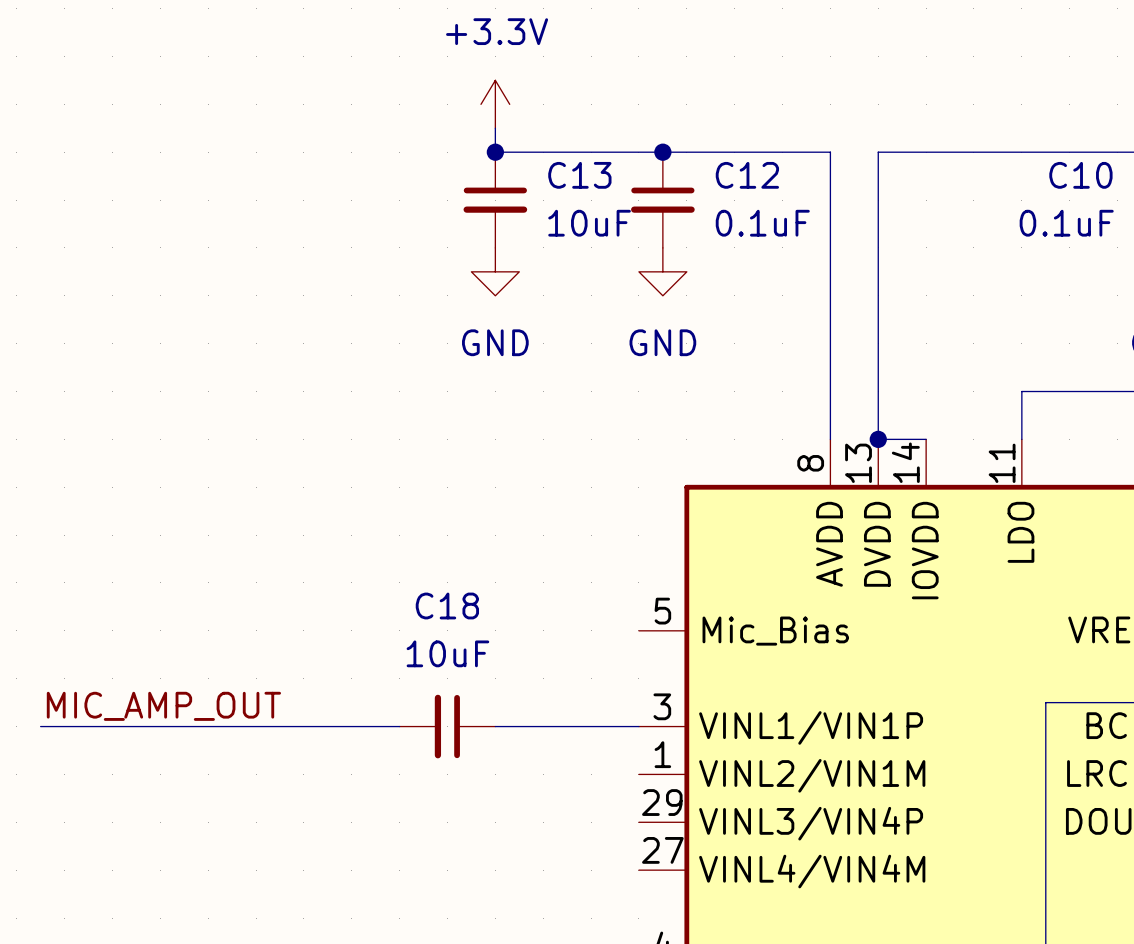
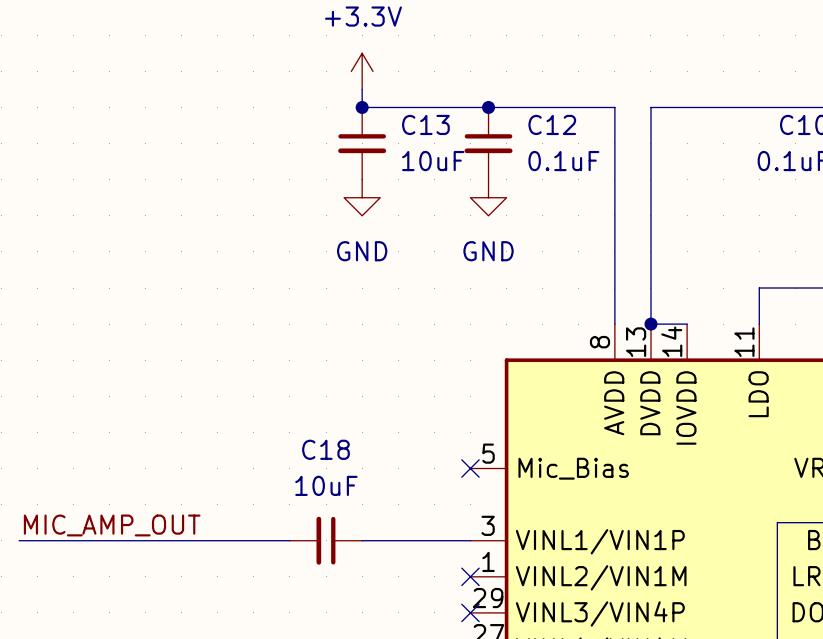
no-connect mark: none -> (470, 468)
no-connect mark: none -> (470, 576)
no-connect mark: none -> (470, 612)

